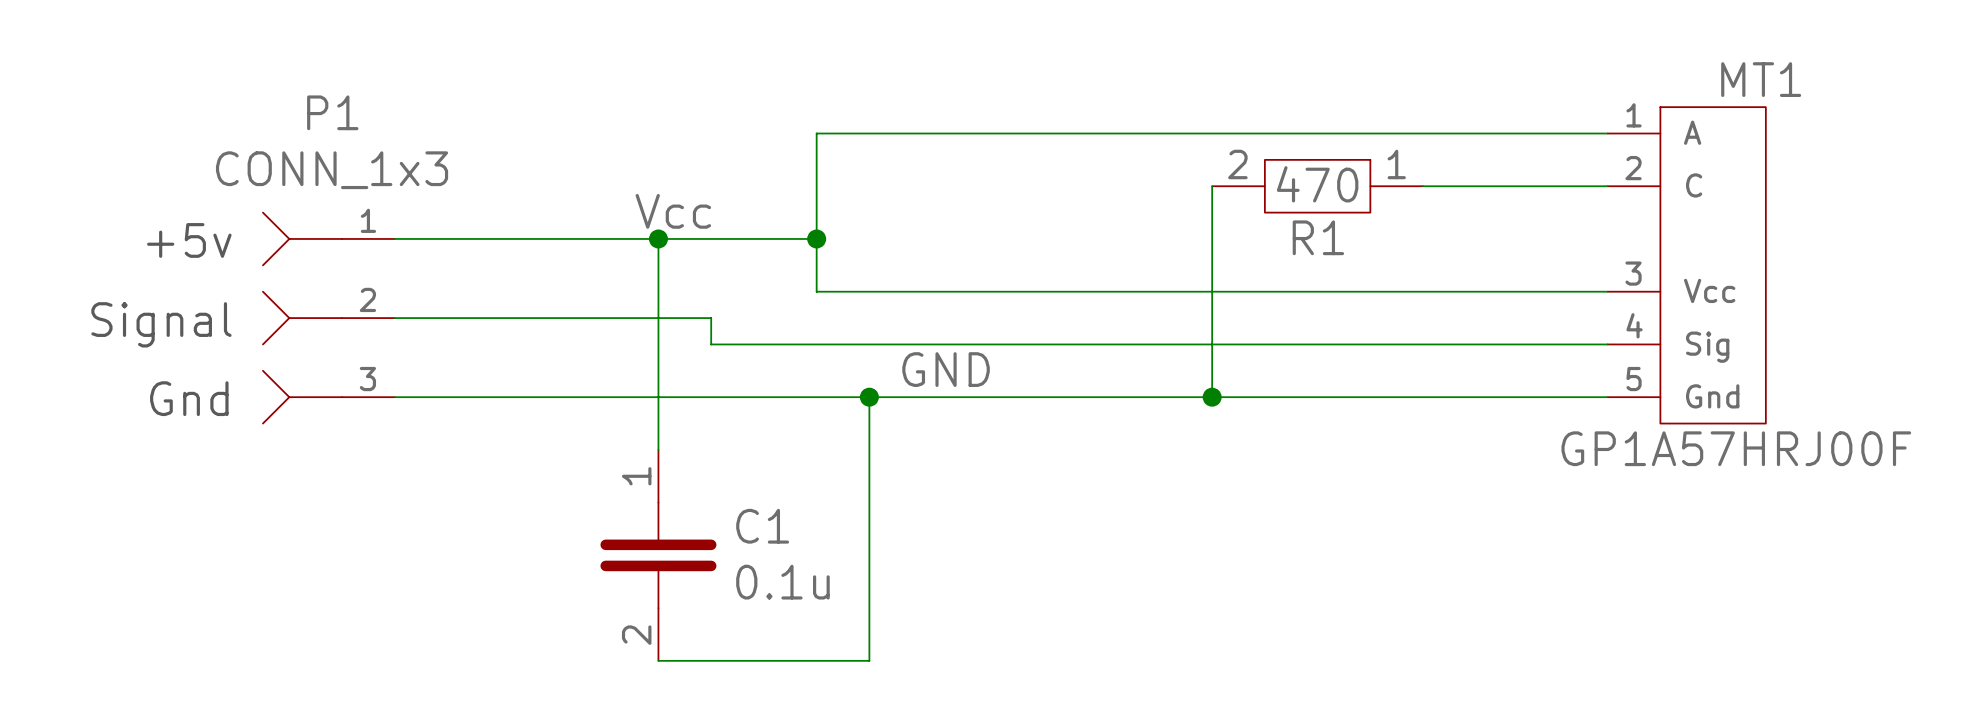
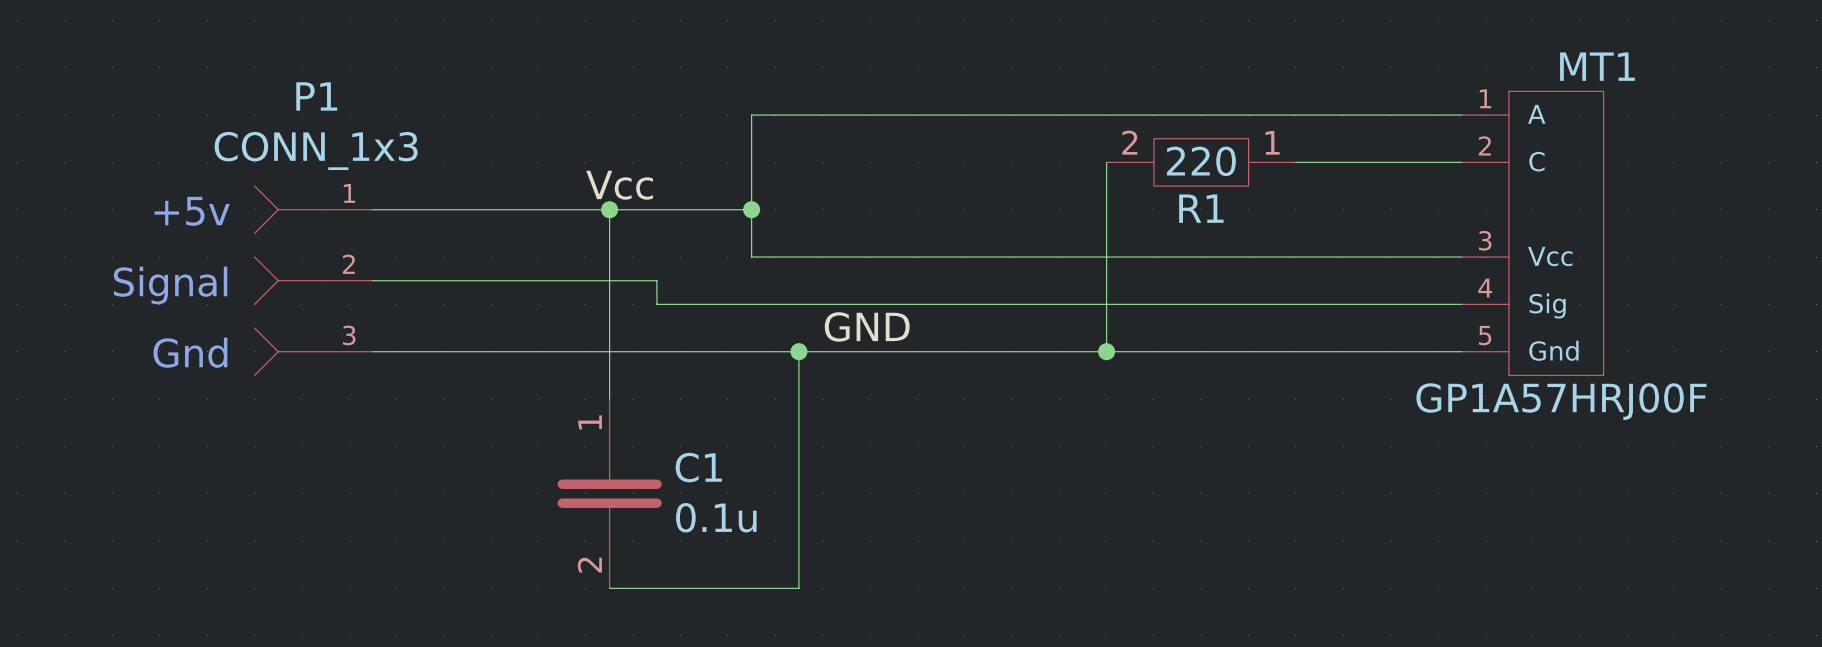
R1 value: 470 (1317, 184) -> 220 (1201, 161)

